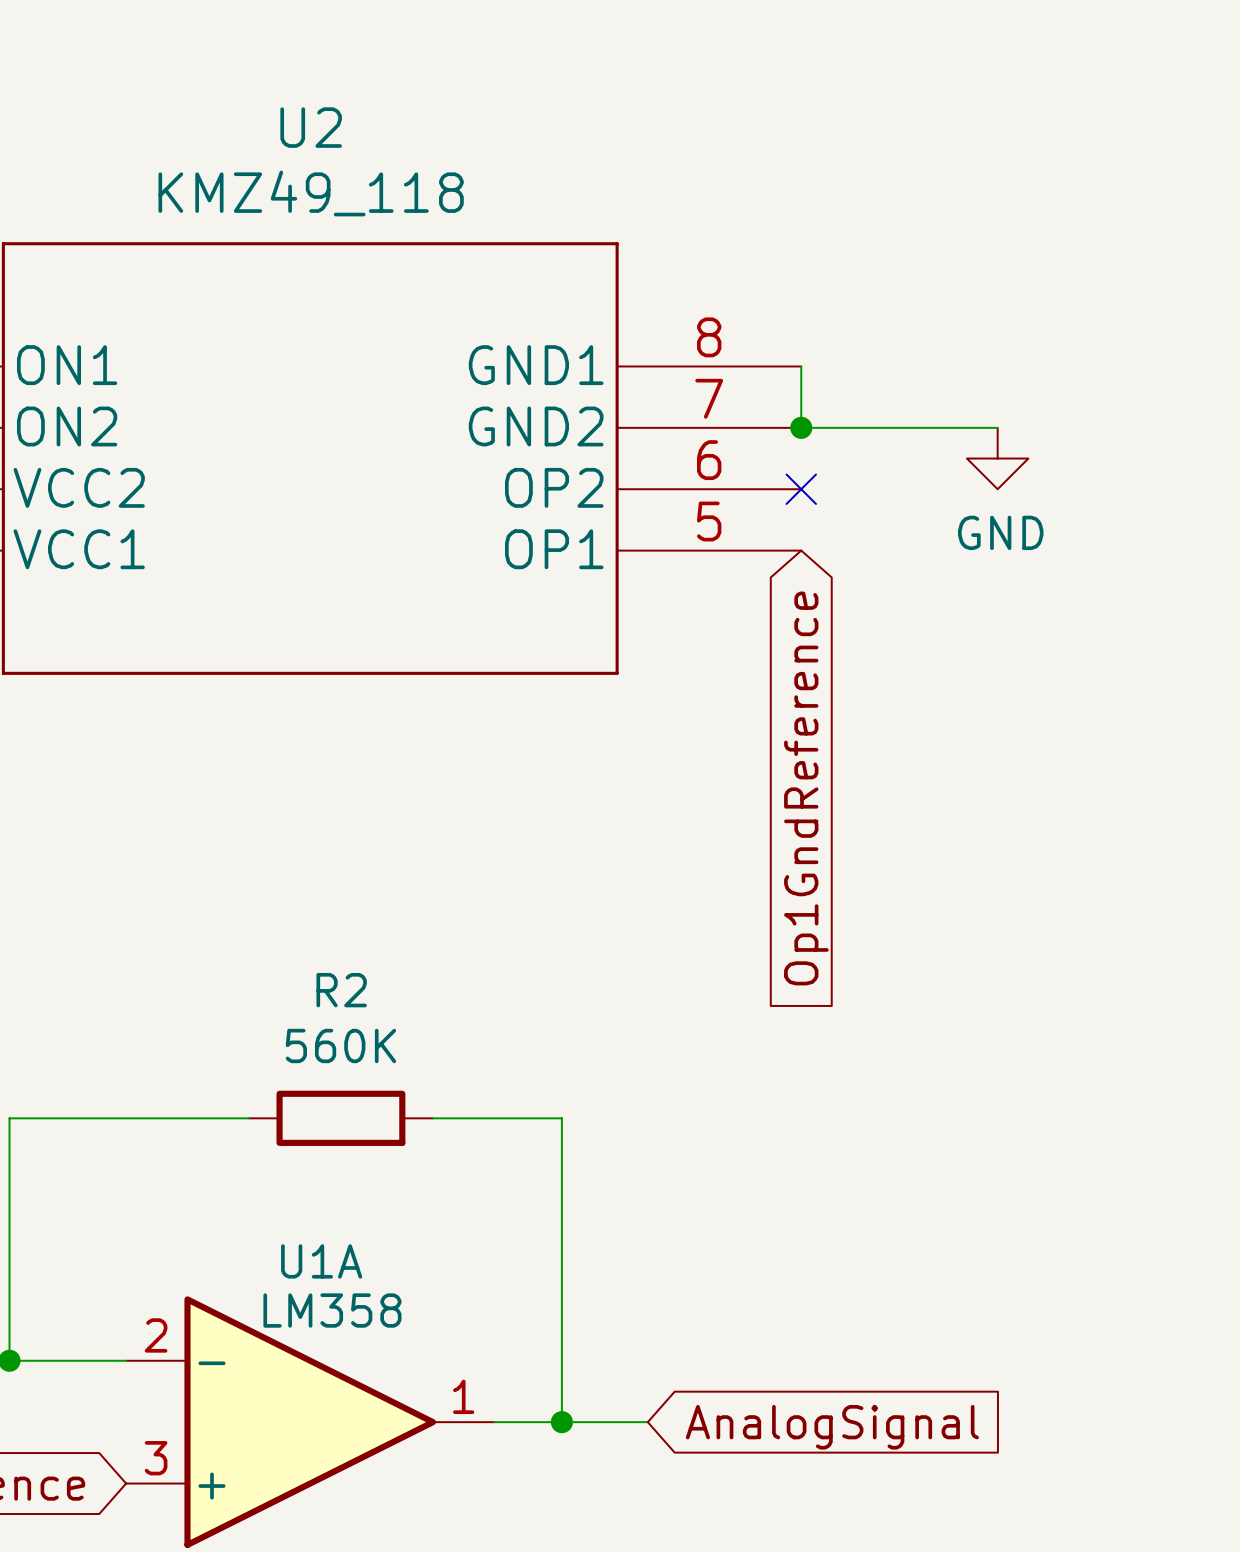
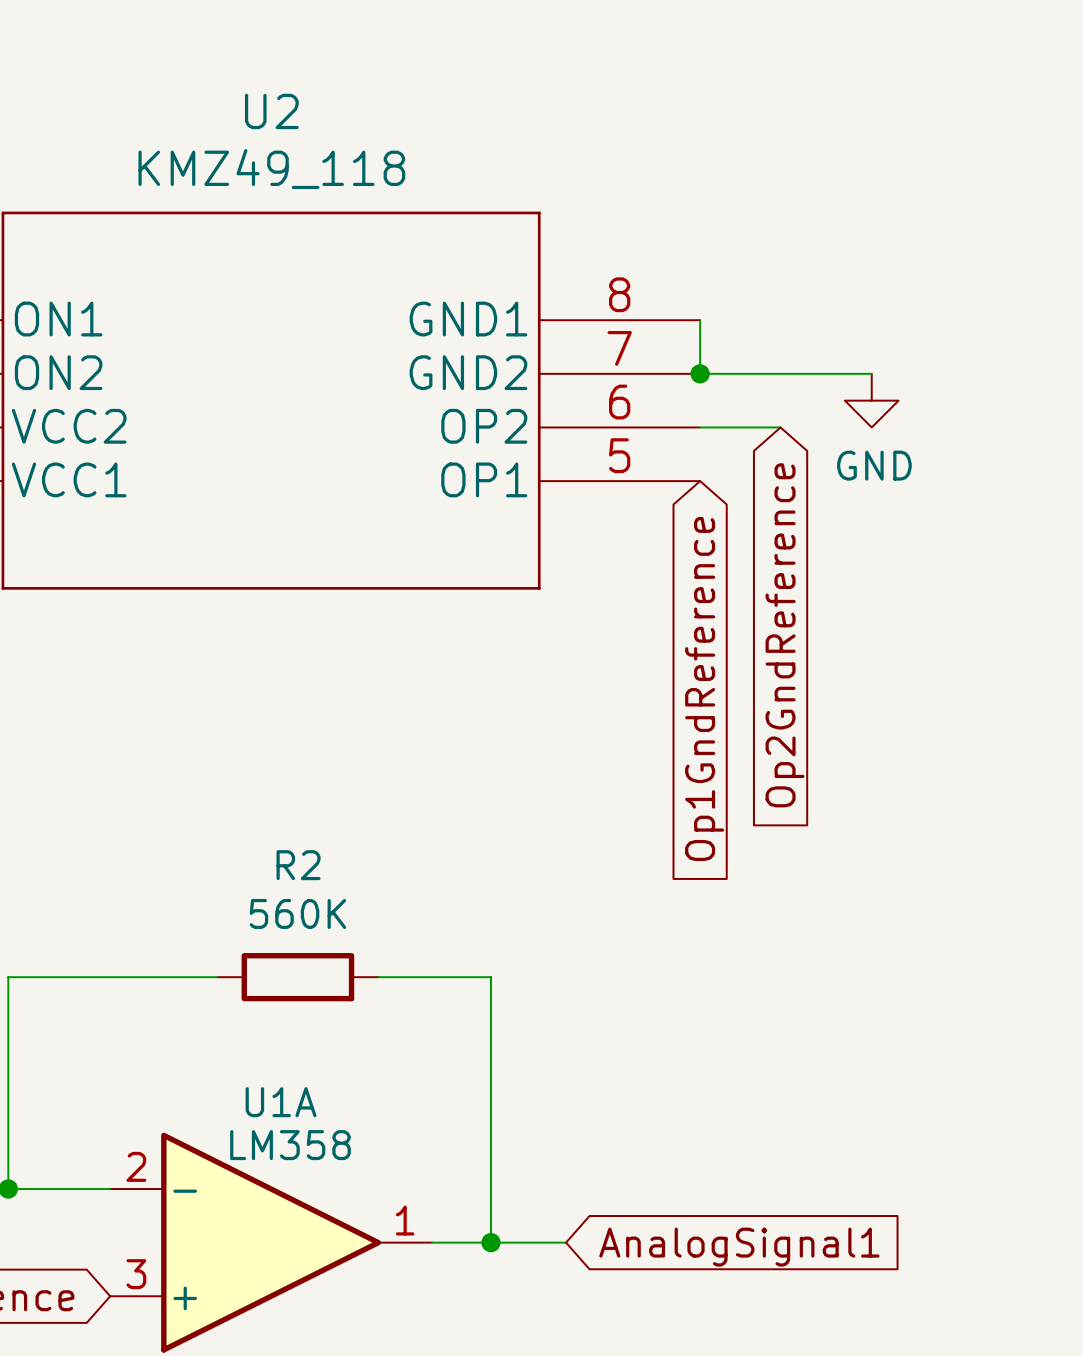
wire: none -> (700, 427) (780, 427)
no-connect mark: (801, 489) -> none
global label: none -> Op2GndReference (785, 635)
global label: AnalogSignal (832, 1427) -> AnalogSignal1 (739, 1247)

